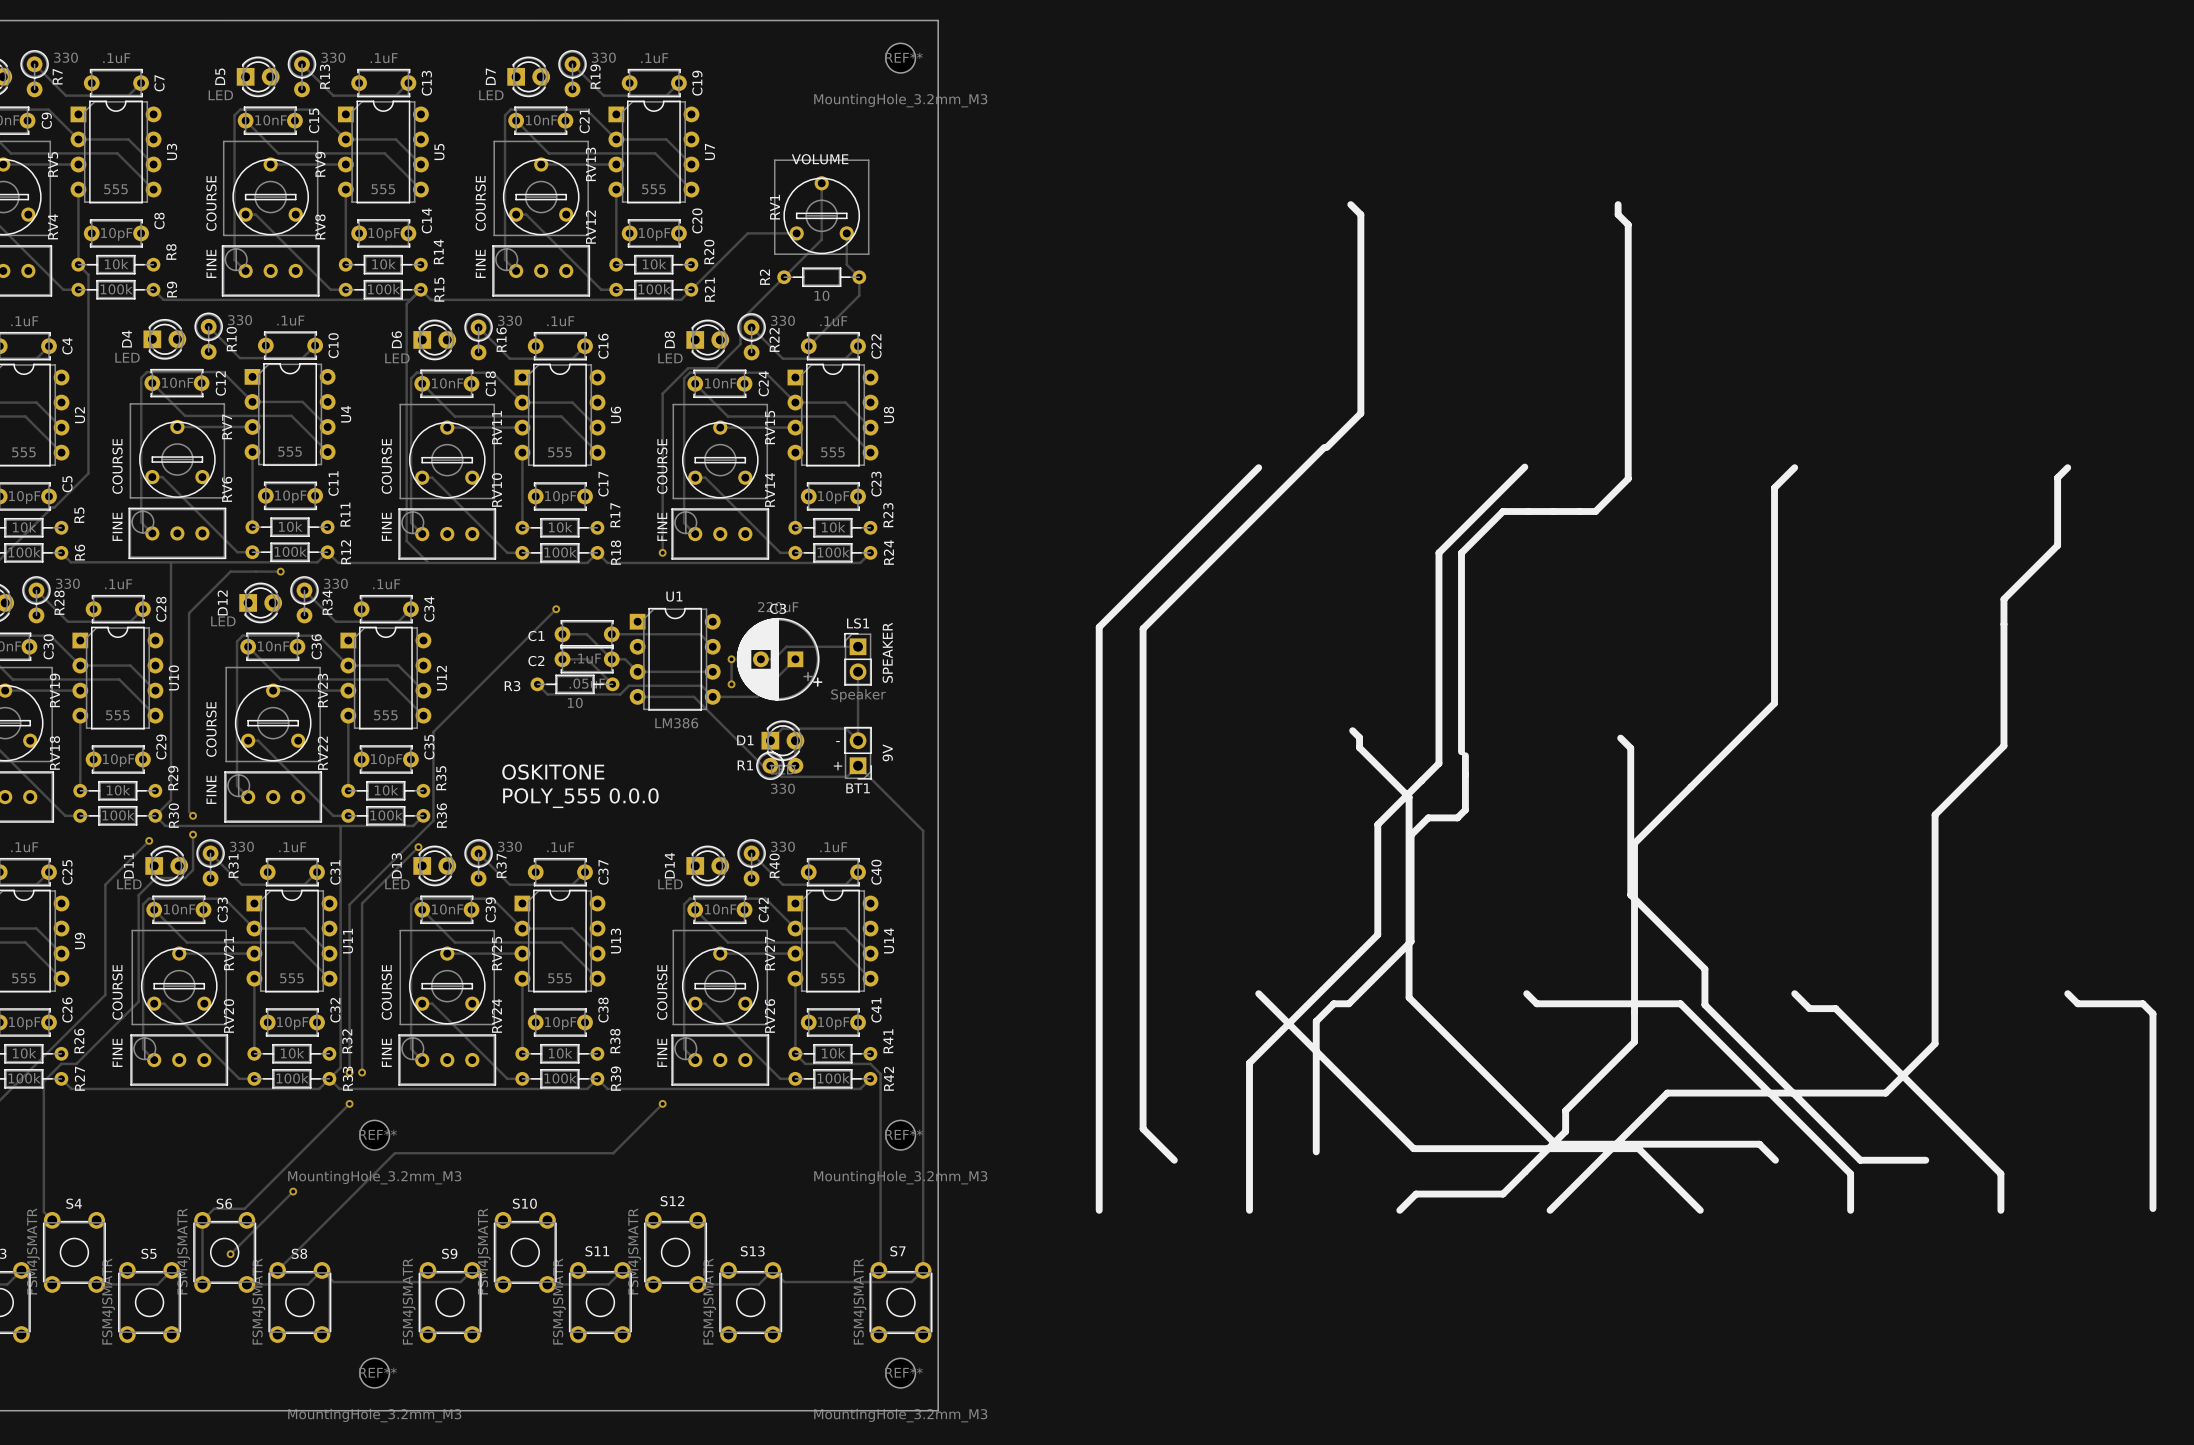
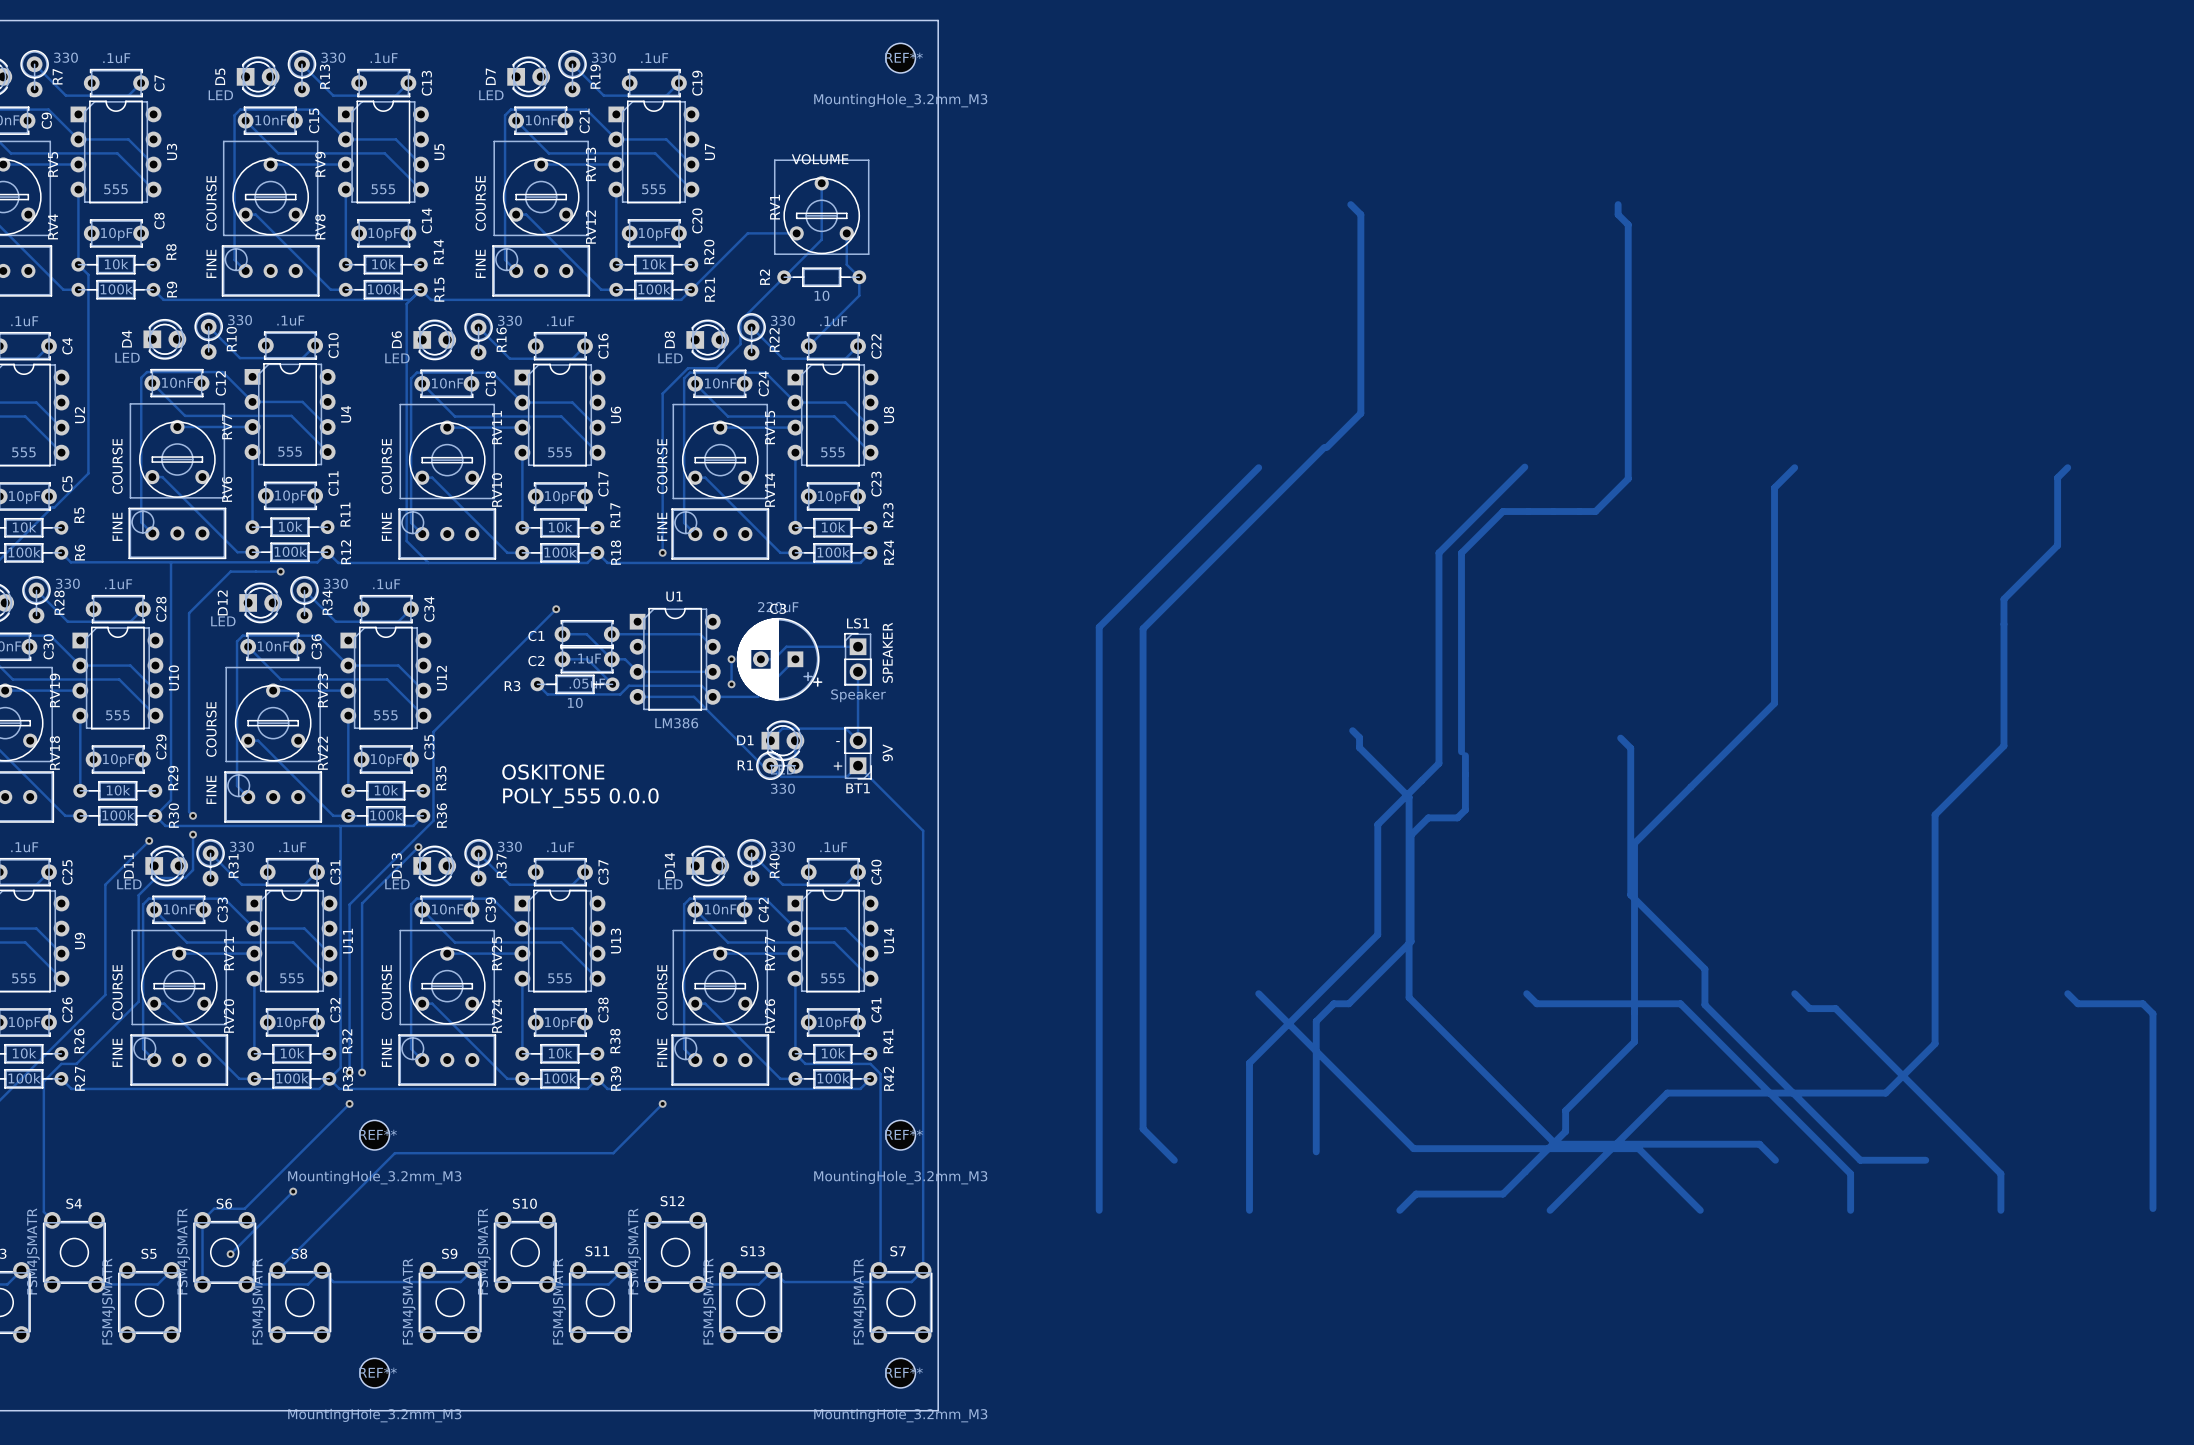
line: (1350, 204) (1360, 214) (1360, 413) (1326, 447) -> none
track: none -> (1350, 204) (1360, 214) (1360, 413) (1326, 447)
line: (1618, 204) (1618, 214) (1628, 224) (1628, 478) (1595, 511) (1503, 511) (1461, 553) (1461, 751) -> none
track: none -> (1618, 204) (1618, 214) (1628, 224) (1628, 478) (1595, 511) (1503, 511) (1461, 553) (1461, 751)
line: (1324, 447) (1143, 628) (1143, 1128) (1174, 1160) -> none
track: none -> (1324, 447) (1143, 628) (1143, 1128) (1174, 1160)
line: (1258, 467) (1099, 627) (1099, 1210) -> none
track: none -> (1258, 467) (1099, 627) (1099, 1210)
line: (1524, 467) (1438, 552) (1438, 763) (1377, 824) (1377, 934) (1249, 1063) (1249, 1210) -> none
track: none -> (1524, 467) (1438, 552) (1438, 763) (1377, 824) (1377, 934) (1249, 1063) (1249, 1210)
line: (1794, 467) (1774, 487) (1774, 703) (1634, 843) (1634, 1041) (1565, 1110) (1565, 1131) (1503, 1194) (1416, 1194) (1399, 1210) -> none
track: none -> (1794, 467) (1774, 487) (1774, 703) (1634, 843) (1634, 1041) (1565, 1110) (1565, 1131) (1503, 1194) (1416, 1194) (1399, 1210)
line: (2067, 467) (2057, 477) (2057, 545) (2003, 599) (2003, 745) (1935, 814) (1935, 1043) (1885, 1093) (1667, 1093) (1550, 1210) -> none
track: none -> (2067, 467) (2057, 477) (2057, 545) (2003, 599) (2003, 745) (1935, 814) (1935, 1043) (1885, 1093) (1667, 1093) (1550, 1210)
line: (1352, 730) (1359, 737) (1359, 747) (1409, 797) (1409, 997) (1555, 1144) (1759, 1144) (1775, 1160) -> none
track: none -> (1352, 730) (1359, 737) (1359, 747) (1409, 797) (1409, 997) (1555, 1144) (1759, 1144) (1775, 1160)
line: (1620, 738) (1630, 748) (1630, 894) (1704, 969) (1704, 1004) (1860, 1160) (1925, 1160) -> none
track: none -> (1620, 738) (1630, 748) (1630, 894) (1704, 969) (1704, 1004) (1860, 1160) (1925, 1160)
line: (1465, 755) (1465, 809) (1457, 817) (1428, 817) (1411, 835) (1411, 941) (1348, 1003) (1333, 1003) (1316, 1021) (1316, 1151) -> none
track: none -> (1465, 755) (1465, 809) (1457, 817) (1428, 817) (1411, 835) (1411, 941) (1348, 1003) (1333, 1003) (1316, 1021) (1316, 1151)
line: (1258, 993) (1413, 1148) (1638, 1148) (1700, 1210) -> none
track: none -> (1258, 993) (1413, 1148) (1638, 1148) (1700, 1210)
line: (1526, 993) (1536, 1003) (1680, 1003) (1850, 1173) (1850, 1210) -> none
track: none -> (1526, 993) (1536, 1003) (1680, 1003) (1850, 1173) (1850, 1210)
line: (1794, 993) (1809, 1008) (1835, 1008) (2000, 1173) (2000, 1210) -> none
track: none -> (1794, 993) (1809, 1008) (1835, 1008) (2000, 1173) (2000, 1210)
line: (2067, 993) (2077, 1003) (2142, 1003) (2152, 1013) (2152, 1208) -> none
track: none -> (2067, 993) (2077, 1003) (2142, 1003) (2152, 1013) (2152, 1208)

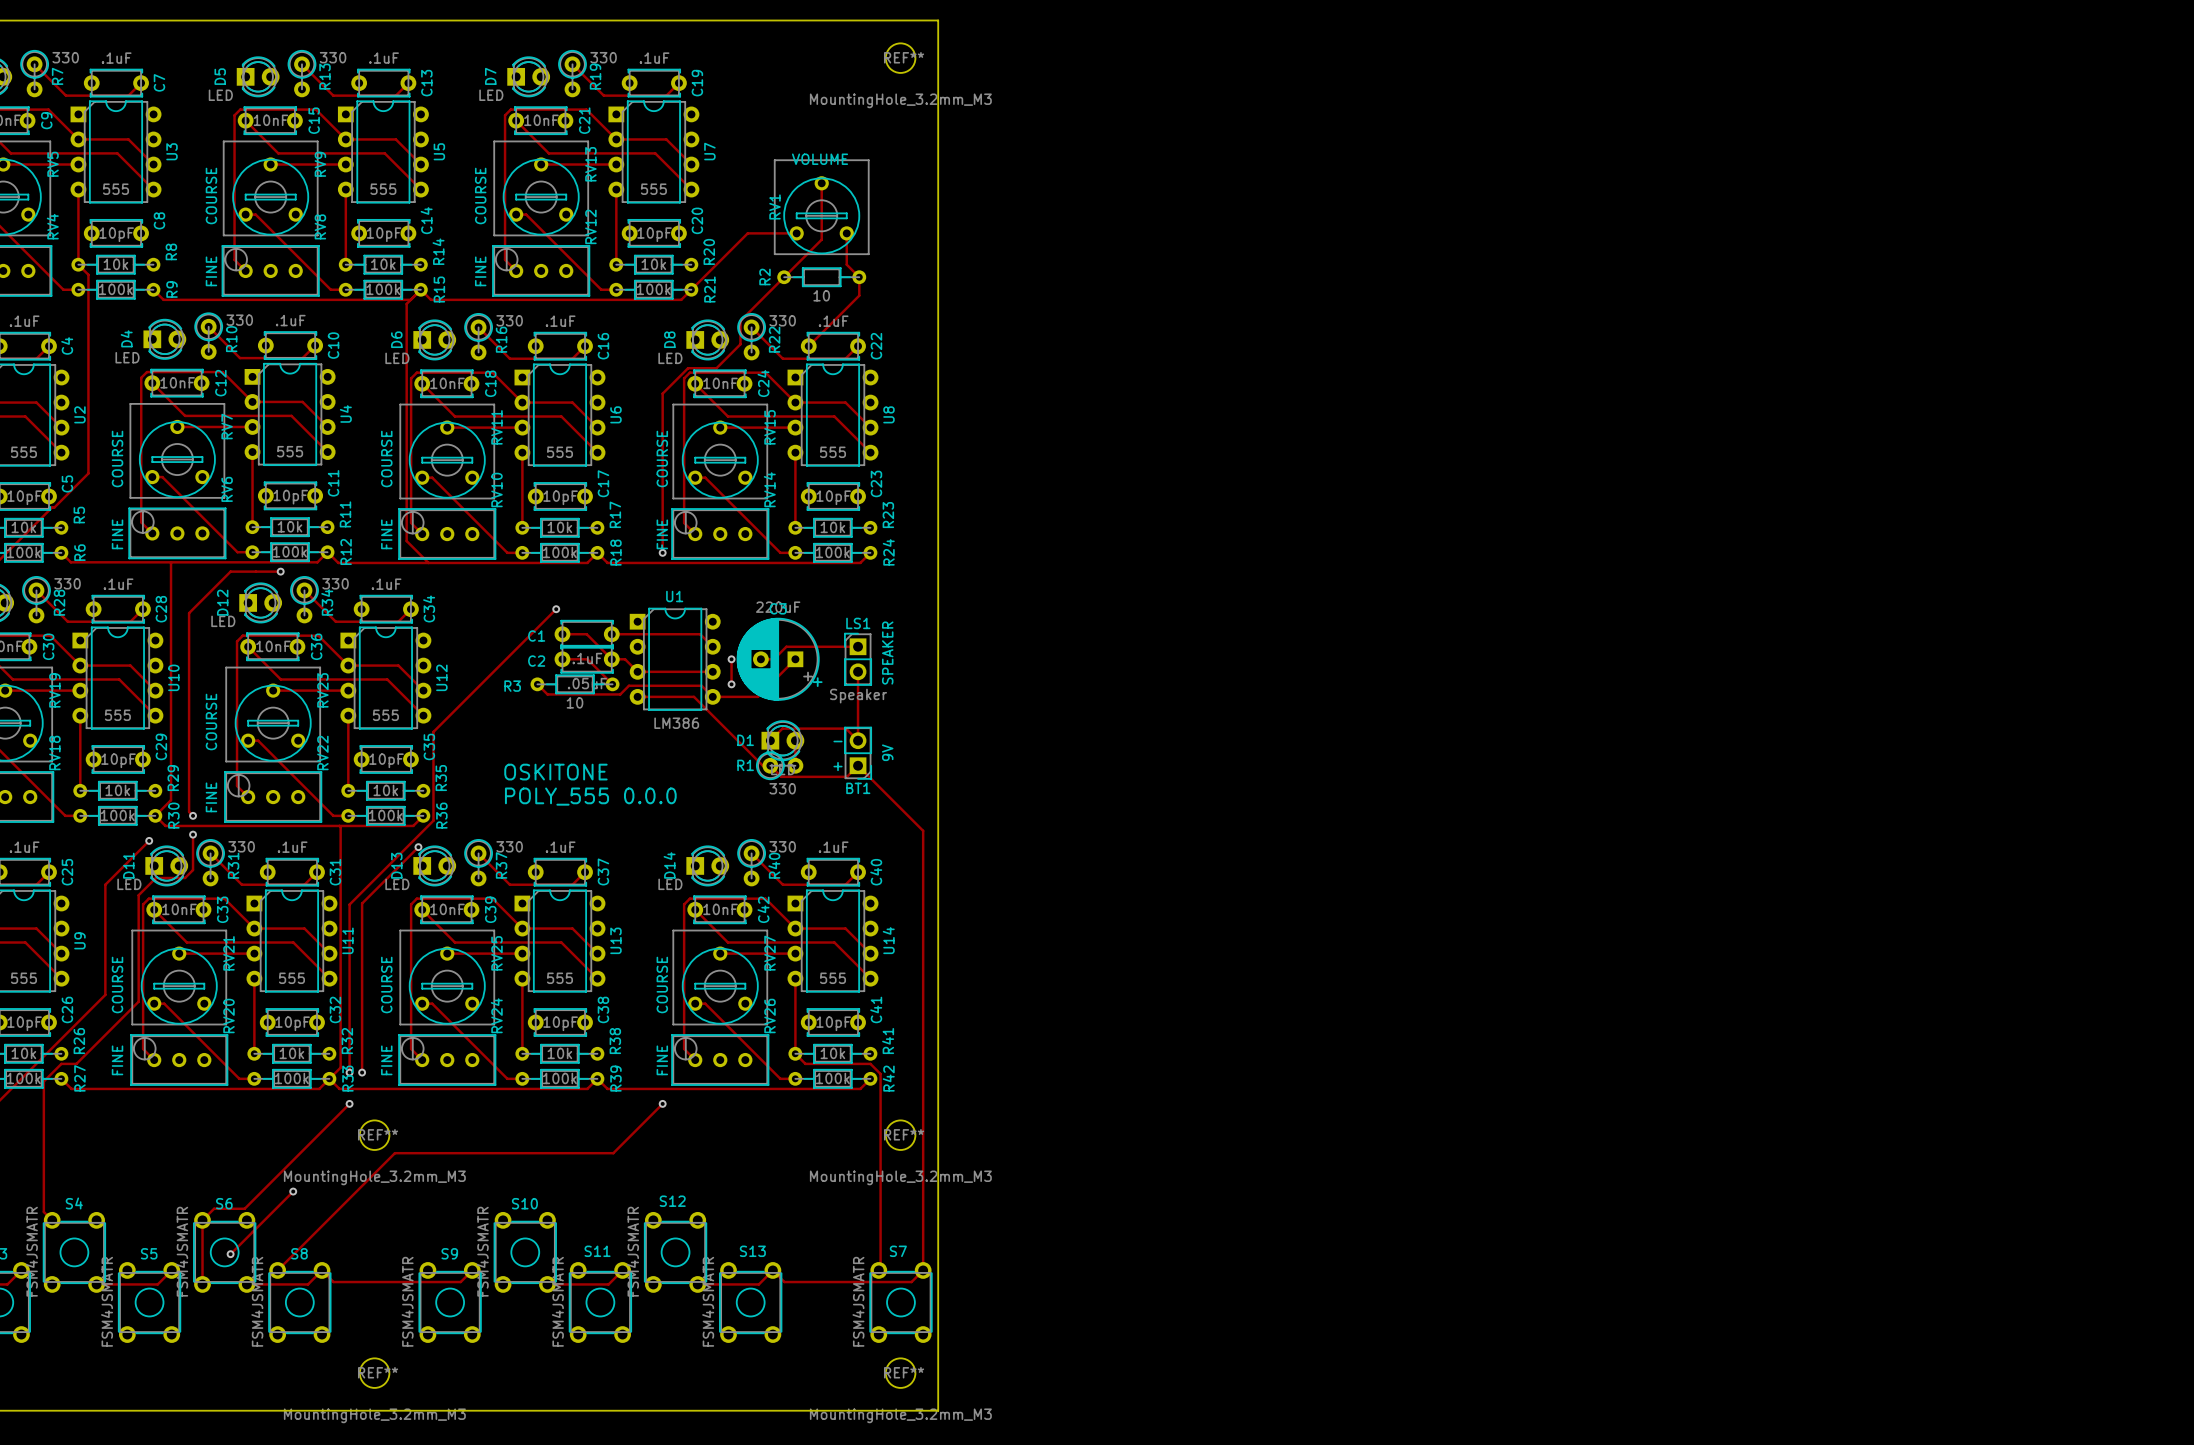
track: (1350, 204) (1360, 214) (1360, 413) (1326, 447) -> none
track: (1618, 204) (1618, 214) (1628, 224) (1628, 478) (1595, 511) (1503, 511) (1461, 553) (1461, 751) -> none
track: (1324, 447) (1143, 628) (1143, 1128) (1174, 1160) -> none
track: (1258, 467) (1099, 627) (1099, 1210) -> none
track: (1524, 467) (1438, 552) (1438, 763) (1377, 824) (1377, 934) (1249, 1063) (1249, 1210) -> none
track: (1794, 467) (1774, 487) (1774, 703) (1634, 843) (1634, 1041) (1565, 1110) (1565, 1131) (1503, 1194) (1416, 1194) (1399, 1210) -> none
track: (2067, 467) (2057, 477) (2057, 545) (2003, 599) (2003, 745) (1935, 814) (1935, 1043) (1885, 1093) (1667, 1093) (1550, 1210) -> none
track: (1352, 730) (1359, 737) (1359, 747) (1409, 797) (1409, 997) (1555, 1144) (1759, 1144) (1775, 1160) -> none
track: (1620, 738) (1630, 748) (1630, 894) (1704, 969) (1704, 1004) (1860, 1160) (1925, 1160) -> none
track: (1465, 755) (1465, 809) (1457, 817) (1428, 817) (1411, 835) (1411, 941) (1348, 1003) (1333, 1003) (1316, 1021) (1316, 1151) -> none
track: (1258, 993) (1413, 1148) (1638, 1148) (1700, 1210) -> none
track: (1526, 993) (1536, 1003) (1680, 1003) (1850, 1173) (1850, 1210) -> none
track: (1794, 993) (1809, 1008) (1835, 1008) (2000, 1173) (2000, 1210) -> none
track: (2067, 993) (2077, 1003) (2142, 1003) (2152, 1013) (2152, 1208) -> none

